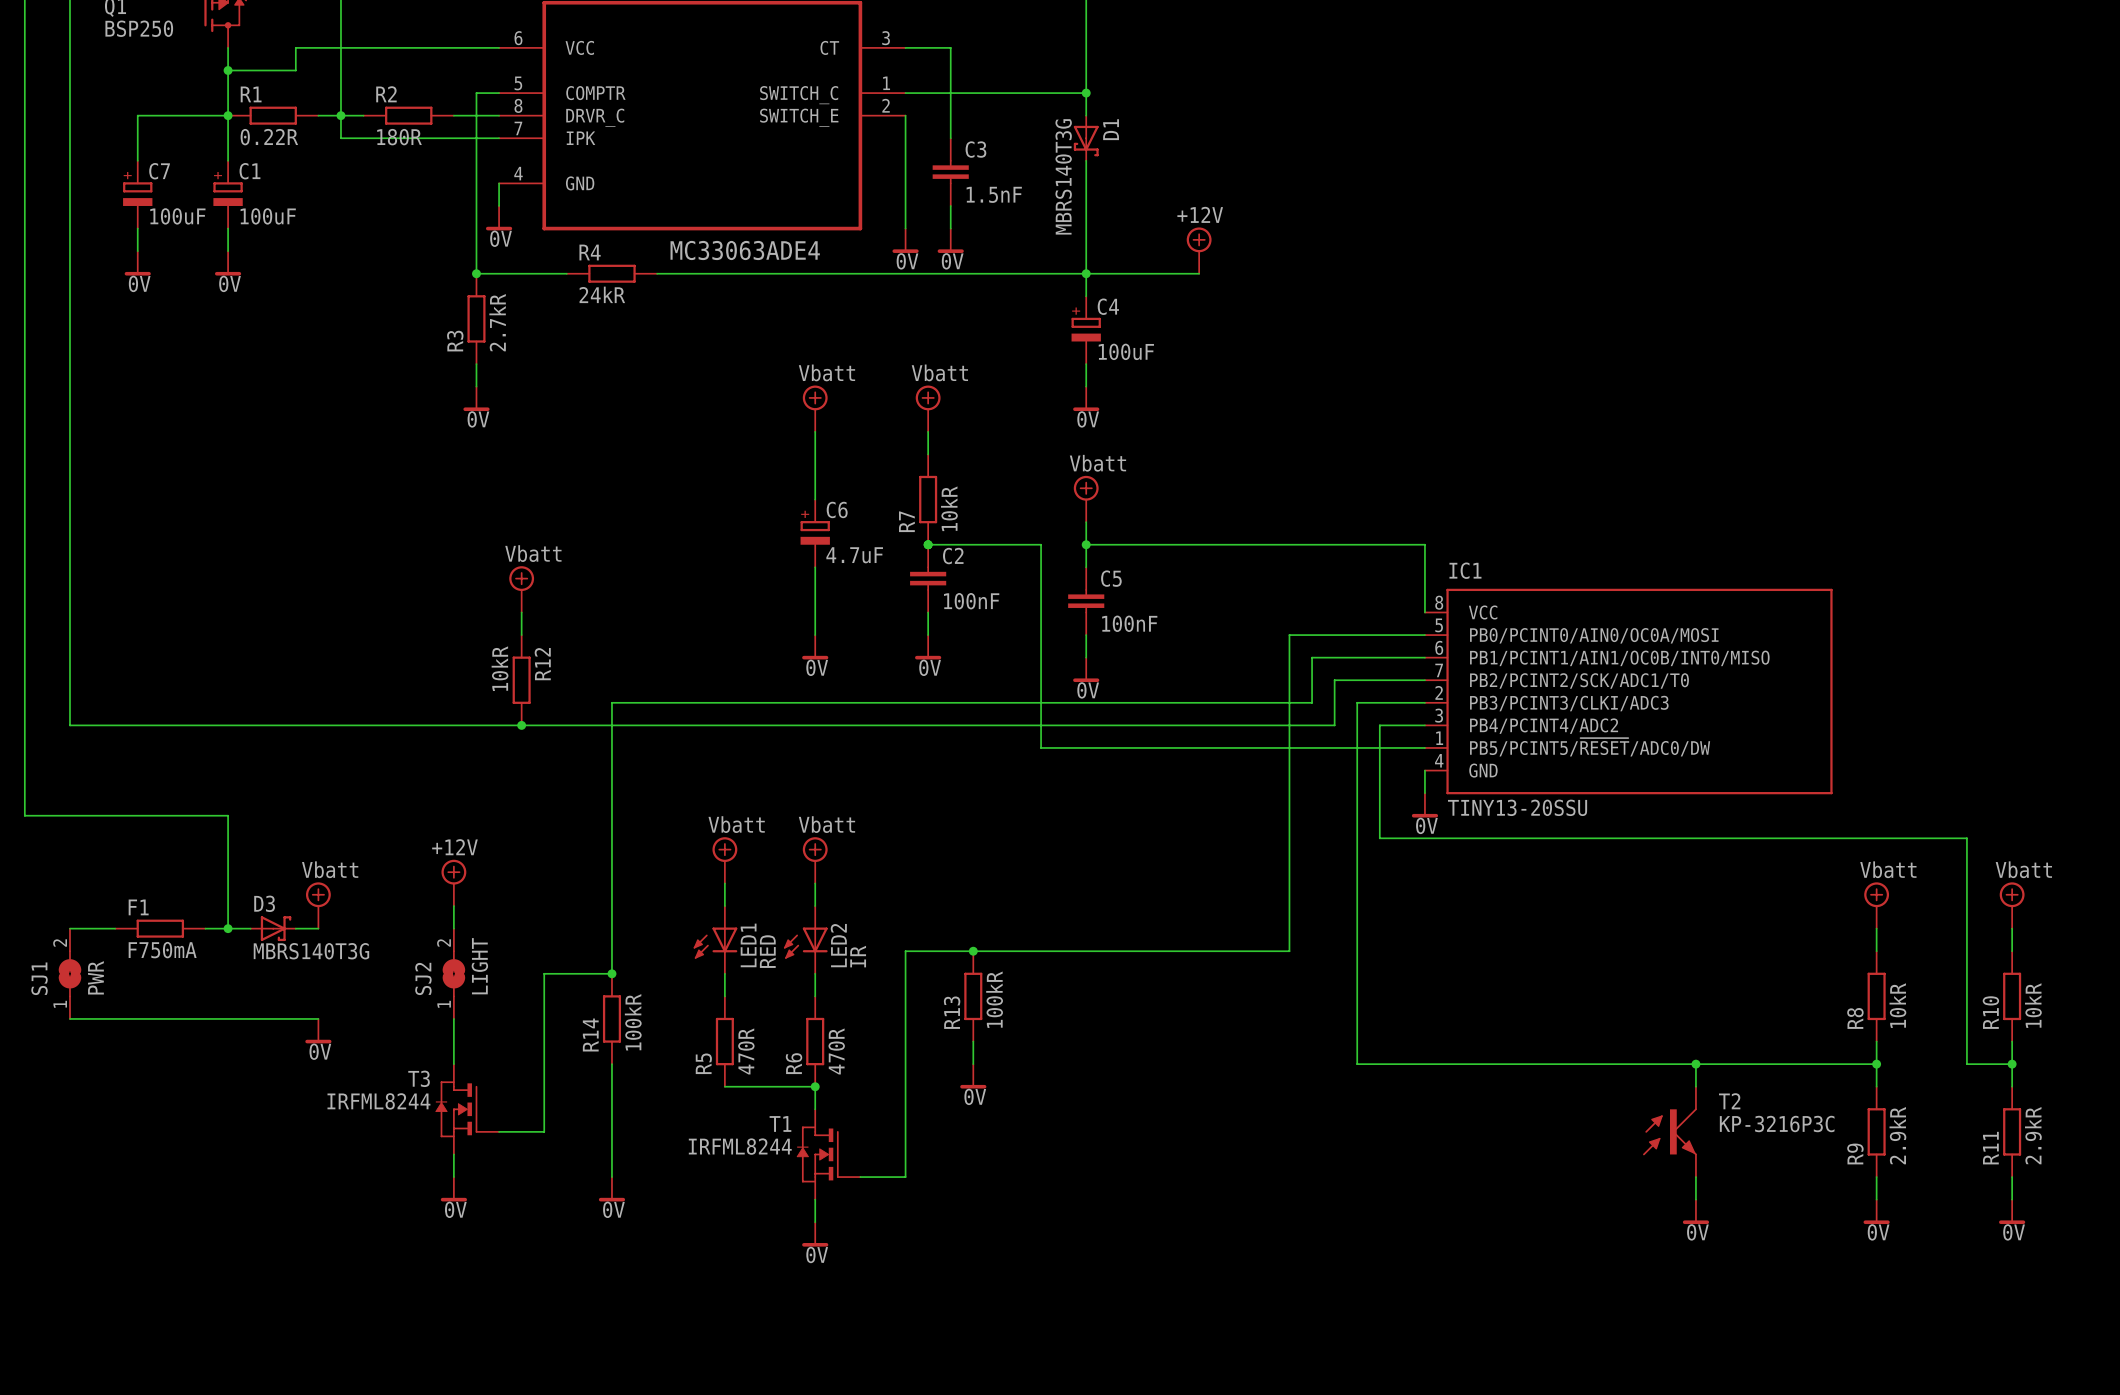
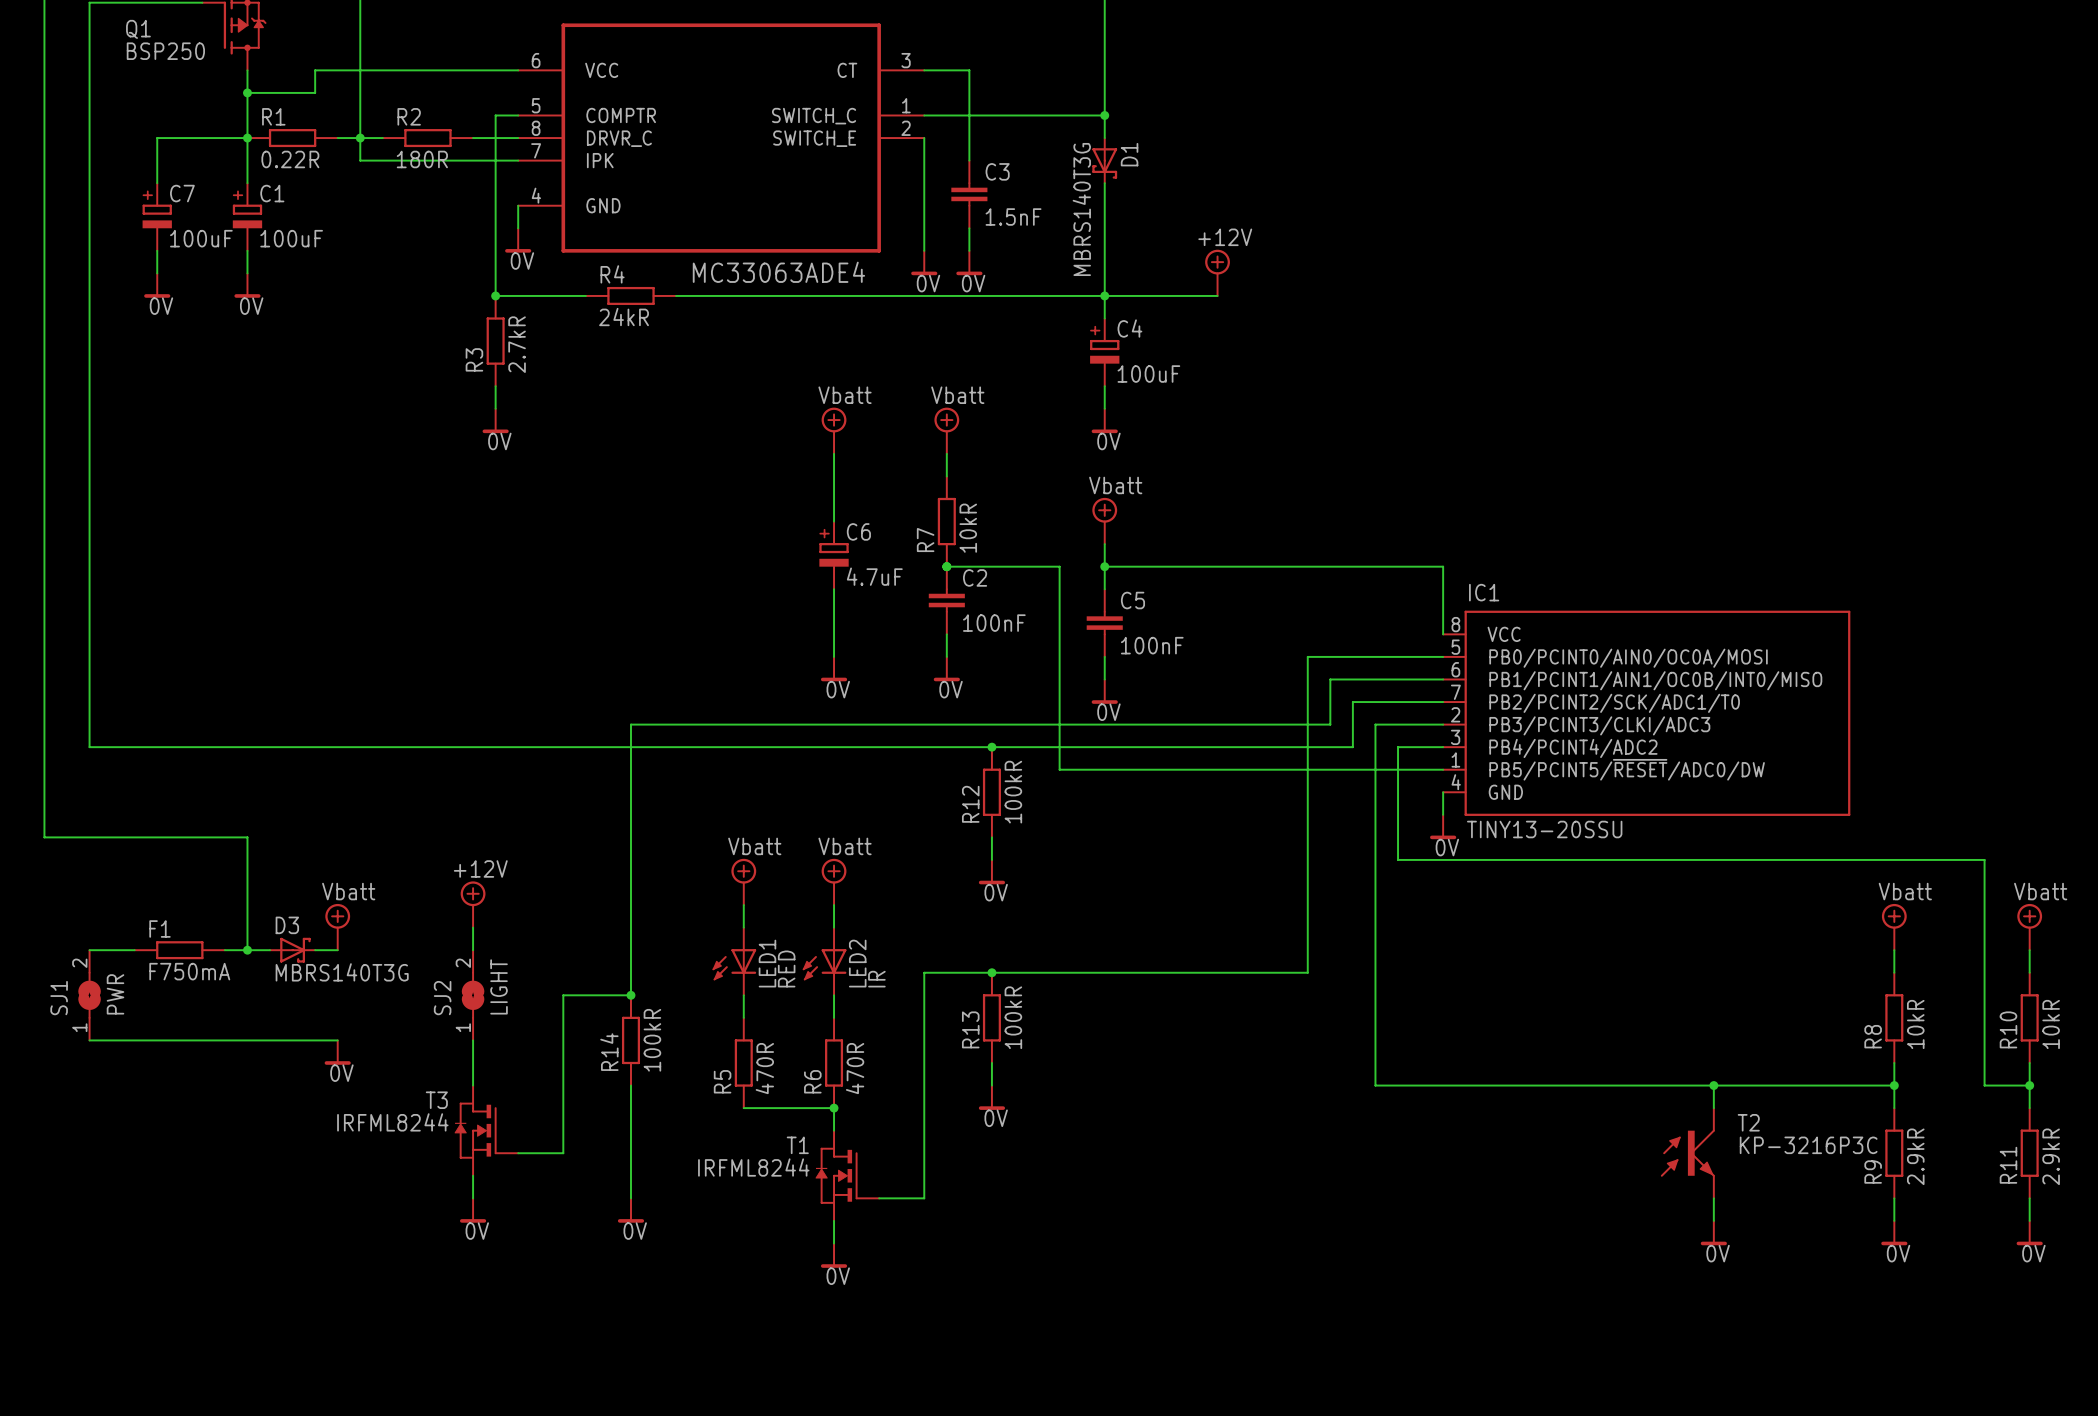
power symbol: Vbatt (521, 589) -> none
wire: (521, 612) (521, 635) -> none
R12 name position: R12 (542, 664) -> R12 (970, 804)
R12 value: 10kR (500, 668) -> 100kR (1013, 792)
R12 position: (521, 680) -> (991, 792)
junction: (521, 725) -> none
junction: none -> (991, 747)
wire: none -> (991, 837) (991, 859)
power symbol: none -> 0V (991, 872)

